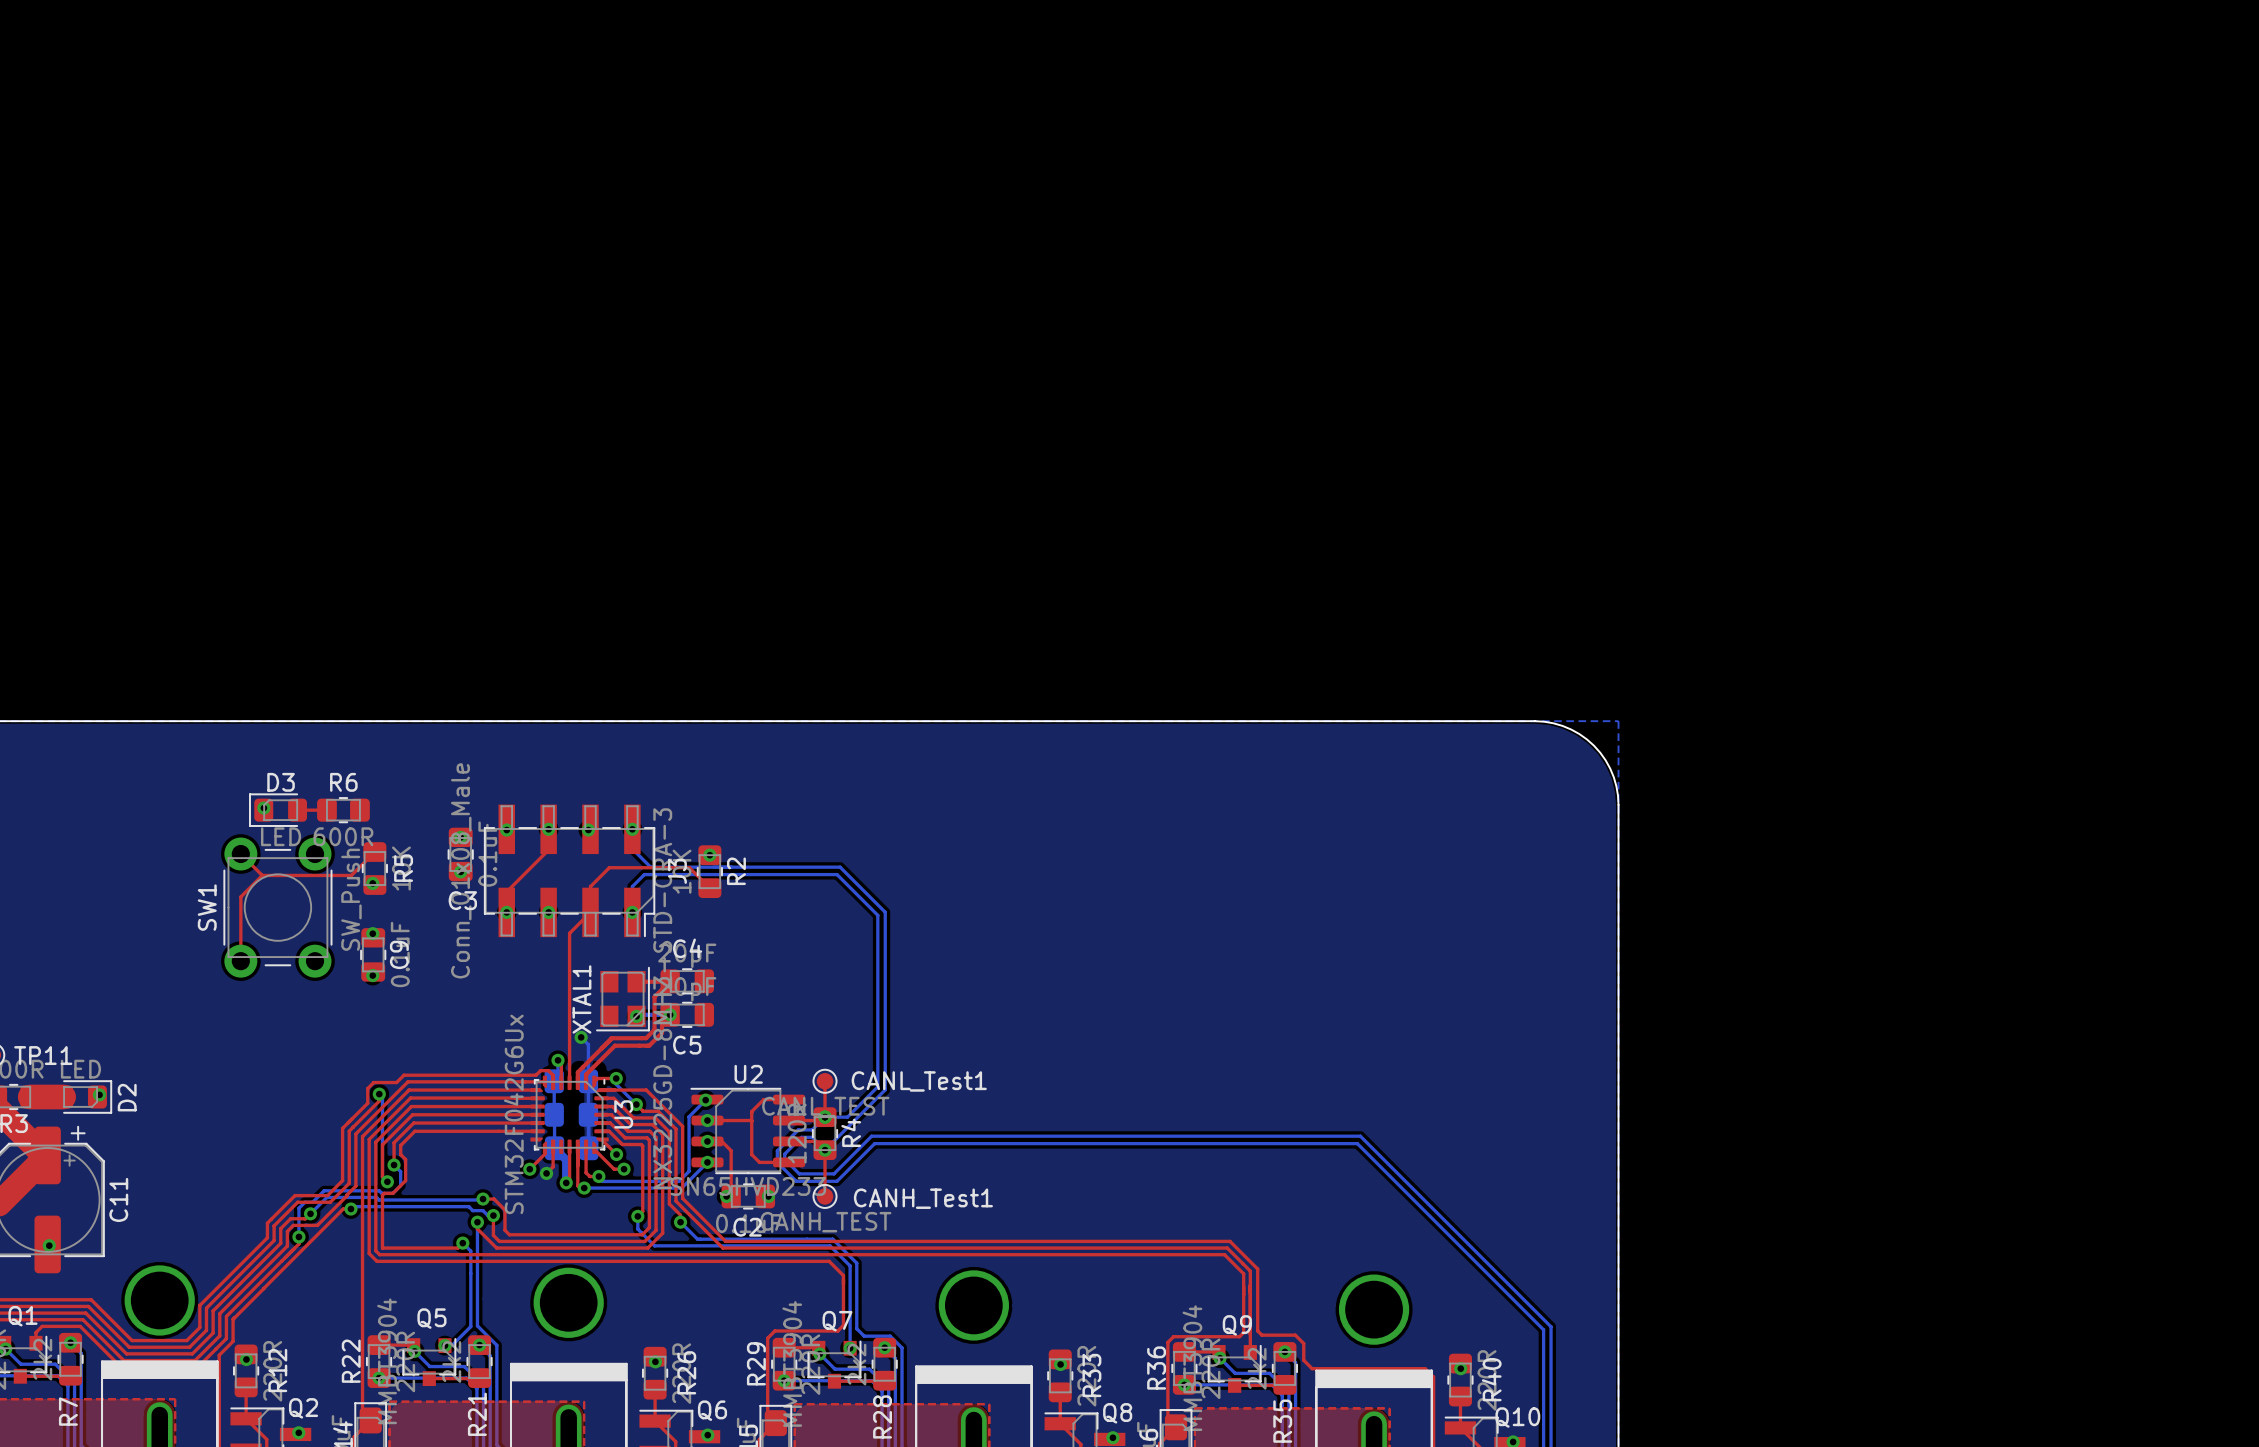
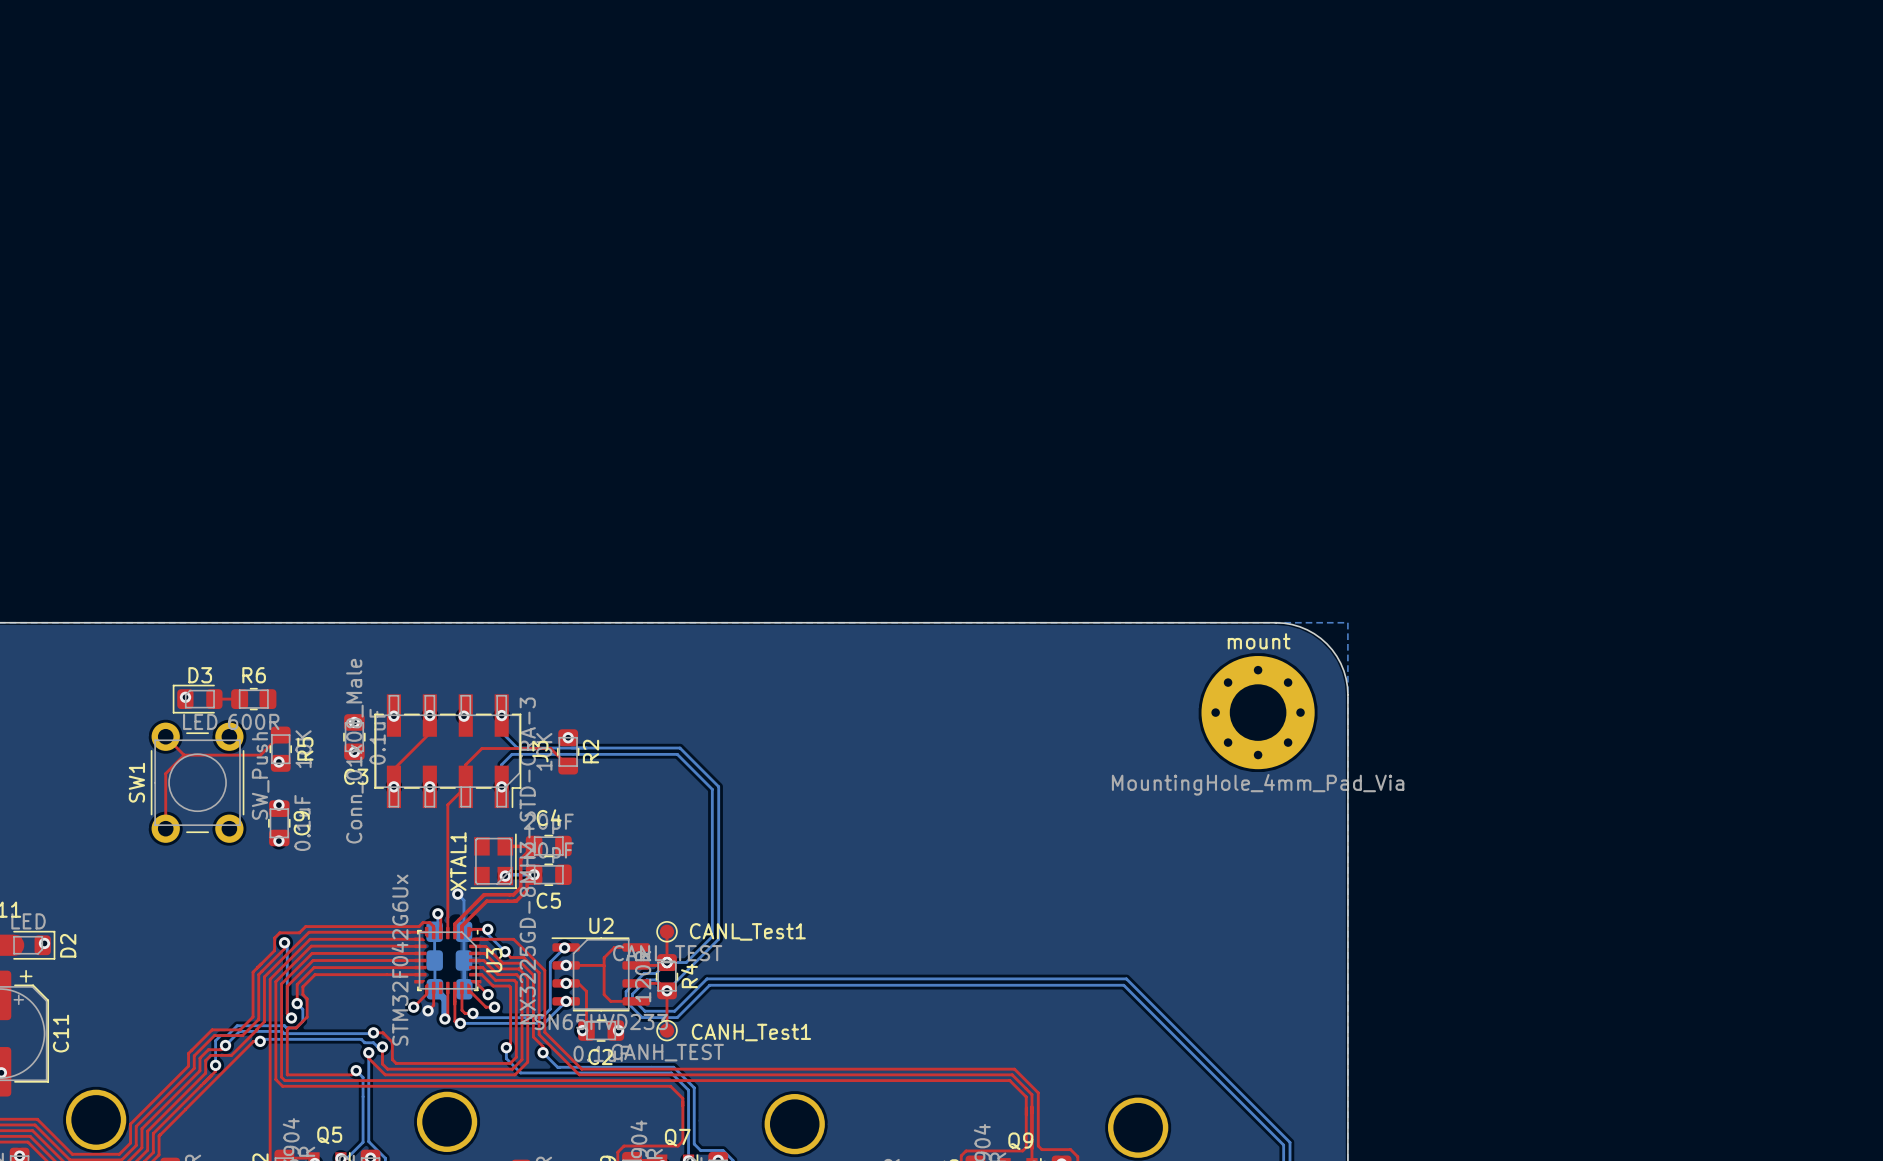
mount: none -> MountingHole_4mm_Pad_Via (1258, 712)

